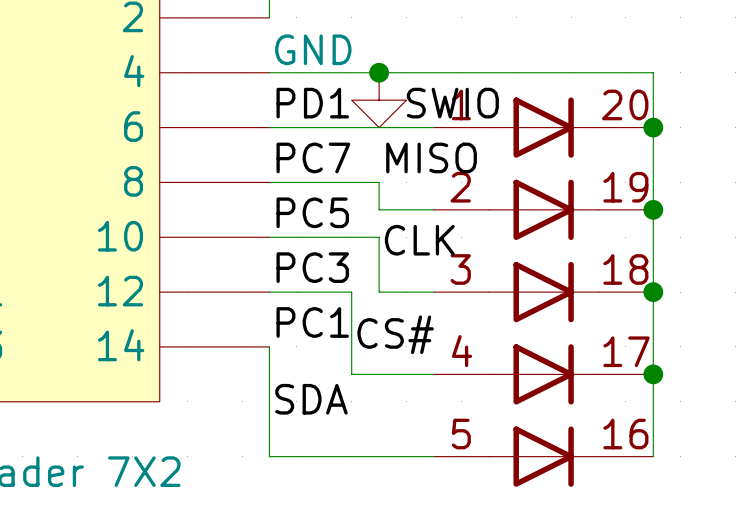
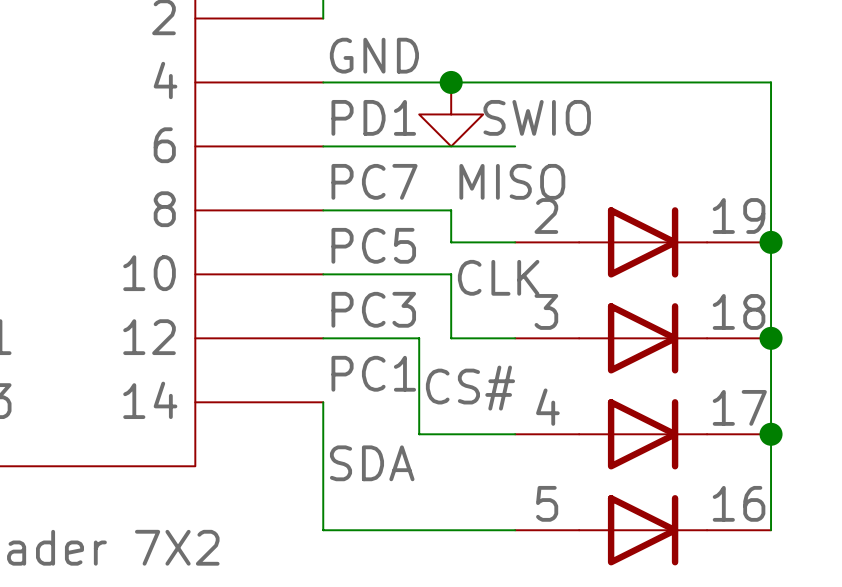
part: (543, 127) -> none
junction: (653, 127) -> none

